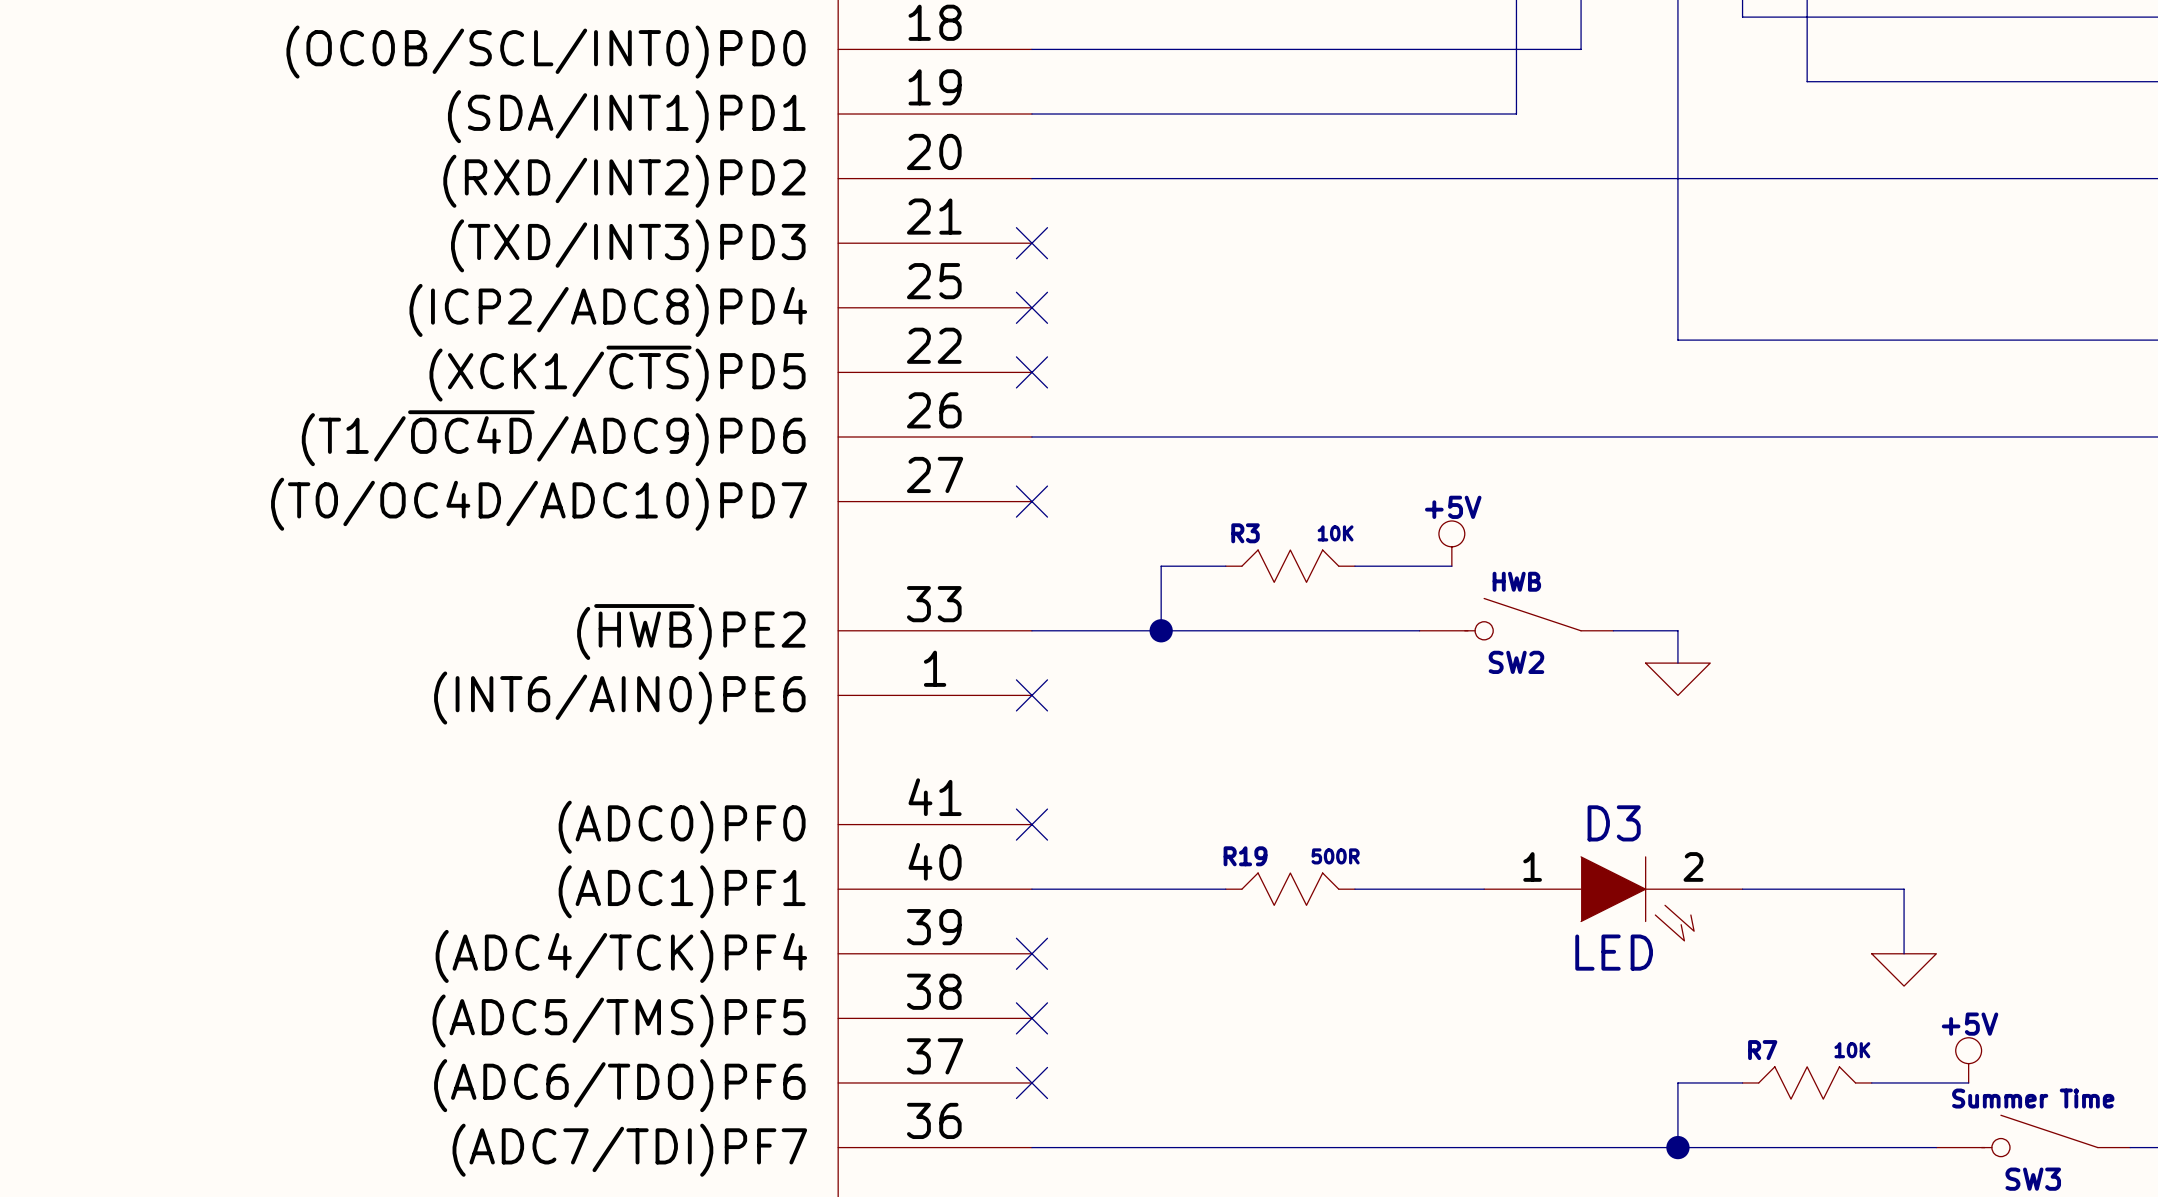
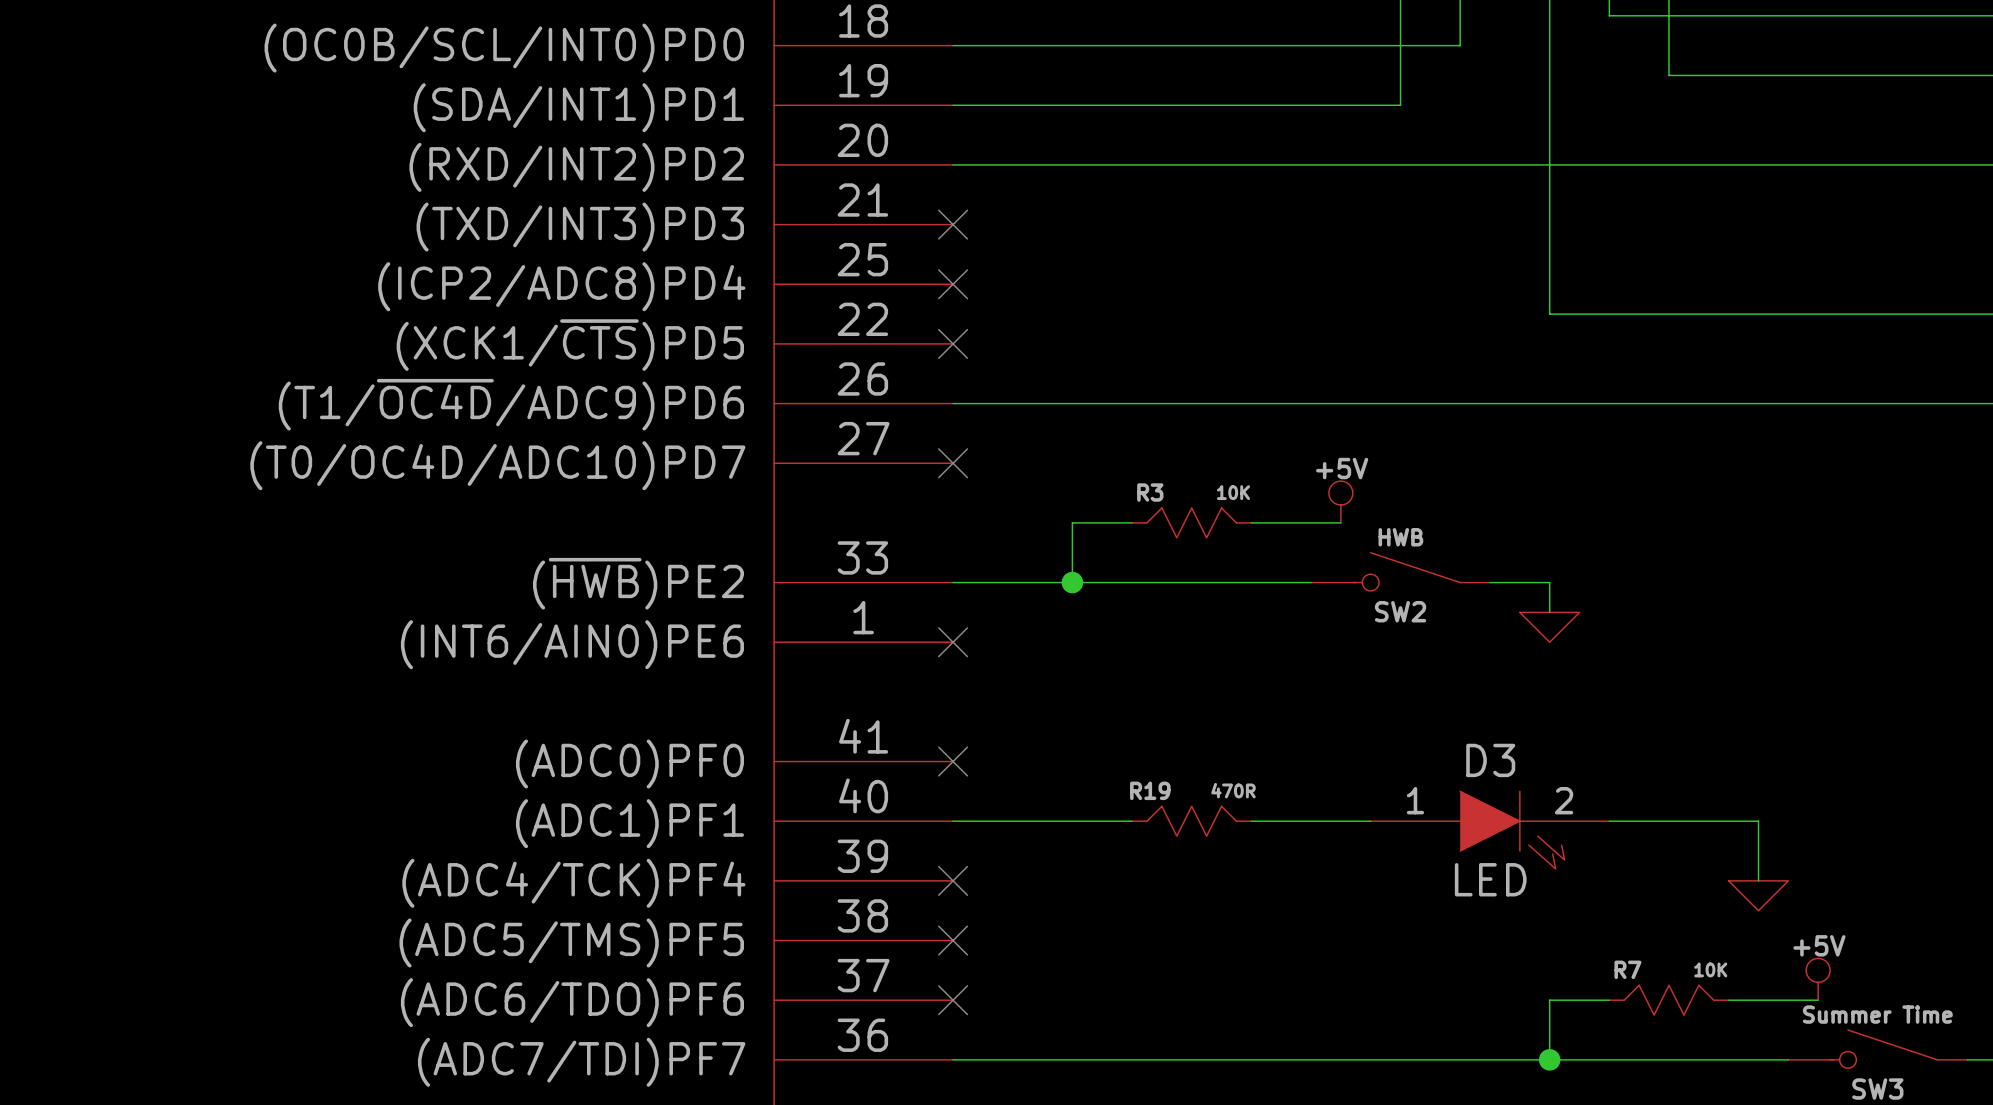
R19 value: 500R (1335, 856) -> 470R (1233, 790)

